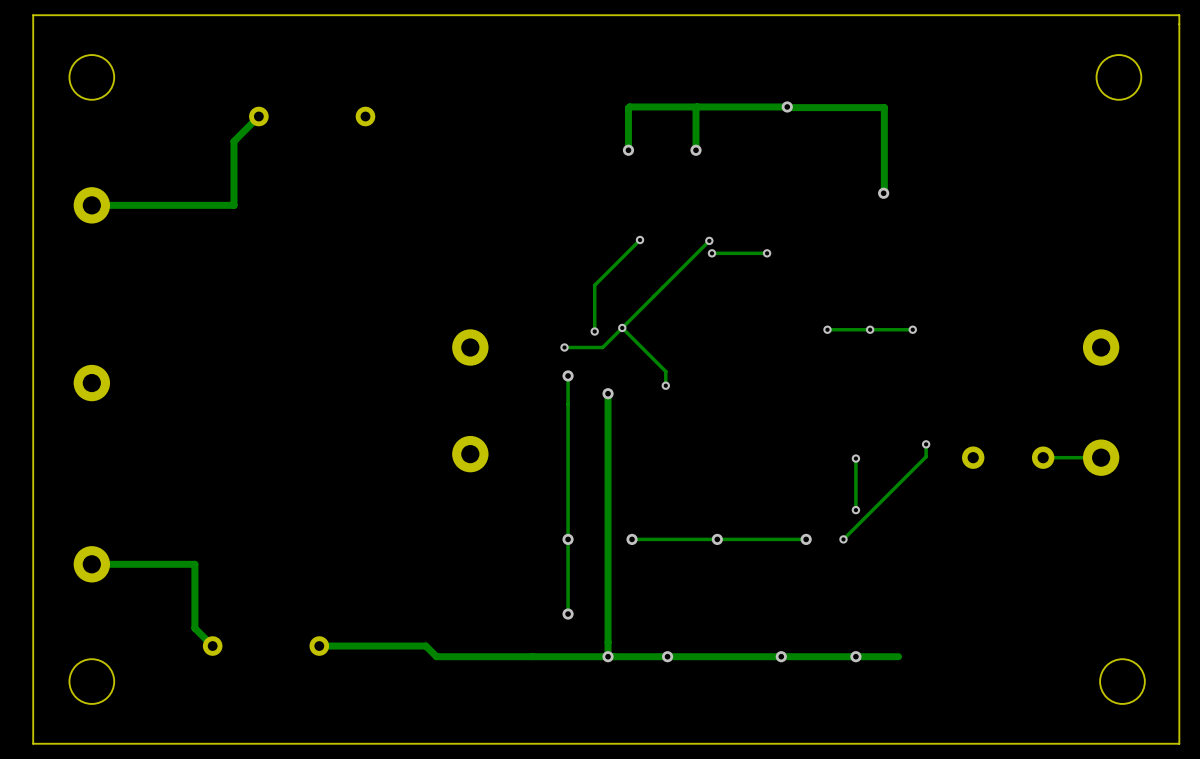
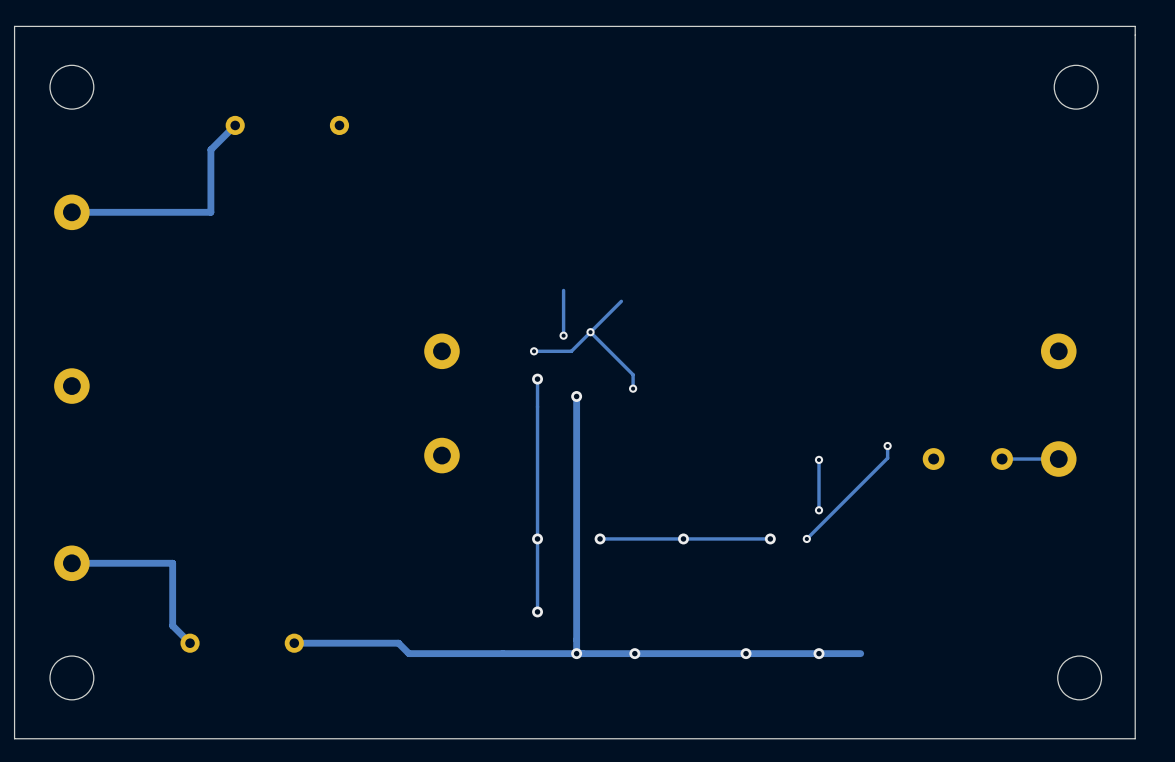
track: (697, 106) (696, 150) -> none
via: (787, 106) -> none
track: (787, 107) (884, 107) (883, 193) -> none
track: (788, 107) (629, 106) (628, 150) -> none
via: (628, 150) -> none
via: (696, 150) -> none
via: (883, 193) -> none
track: (640, 240) (594, 285) -> none
via: (640, 240) -> none
track: (709, 240) (653, 296) -> none
via: (709, 240) -> none
via: (711, 253) -> none
track: (767, 253) (711, 253) -> none
via: (767, 253) -> none
via: (827, 329) -> none
via: (870, 329) -> none
track: (912, 329) (827, 329) -> none
via: (912, 329) -> none

